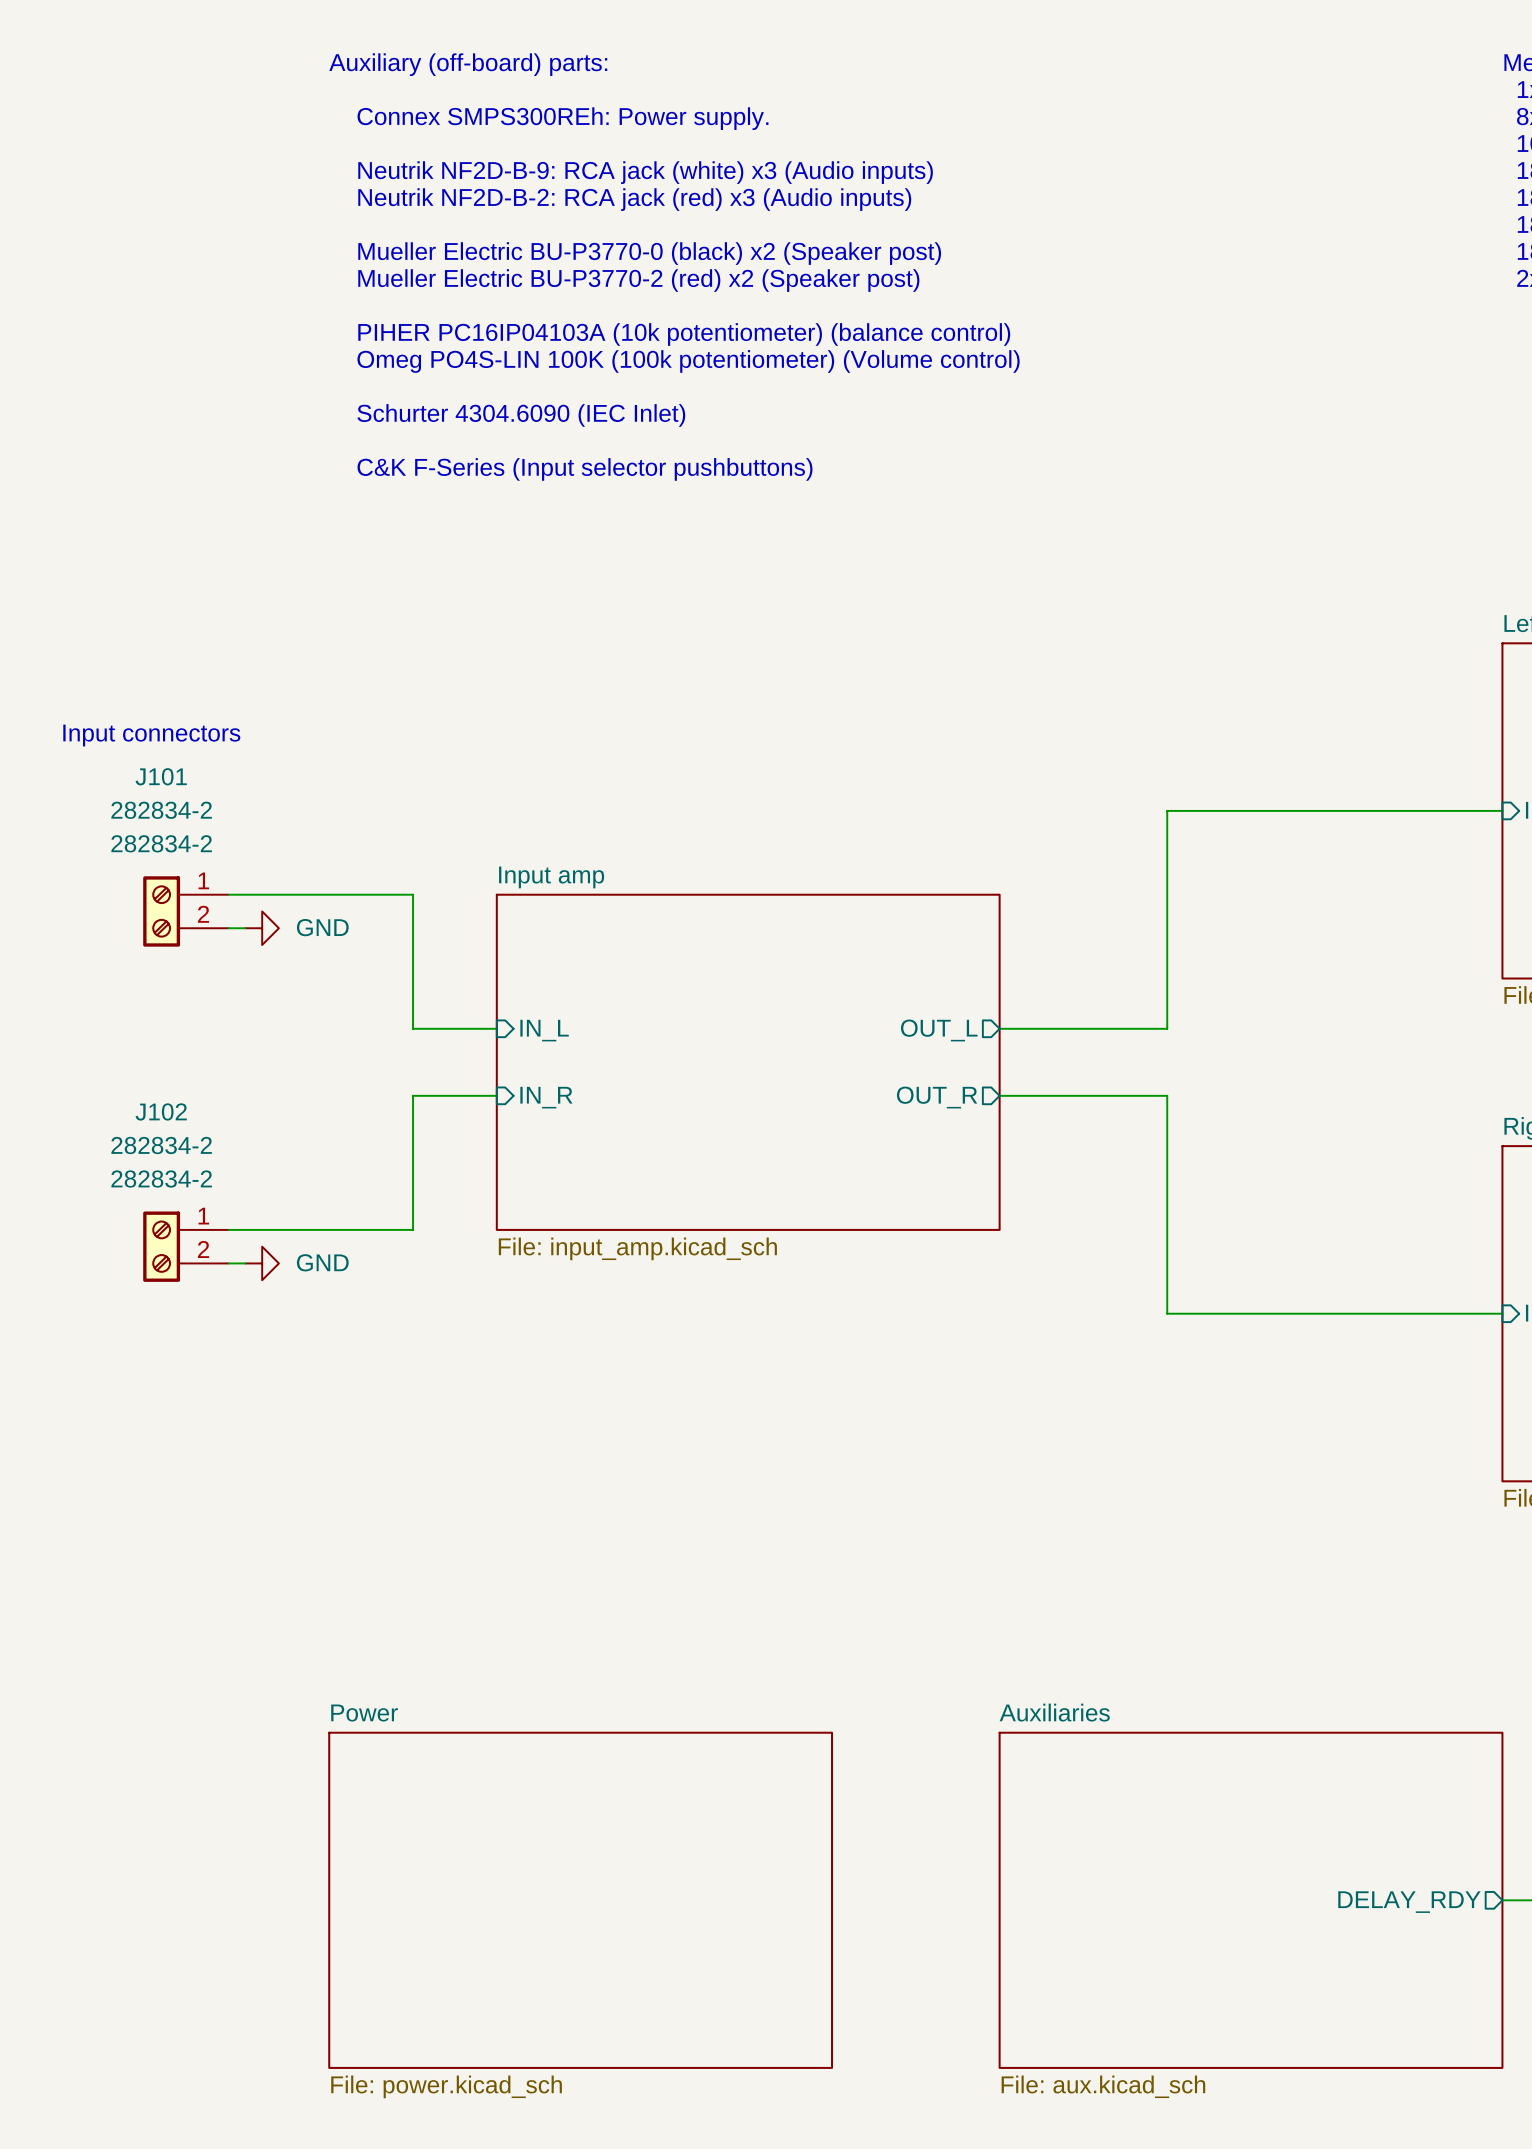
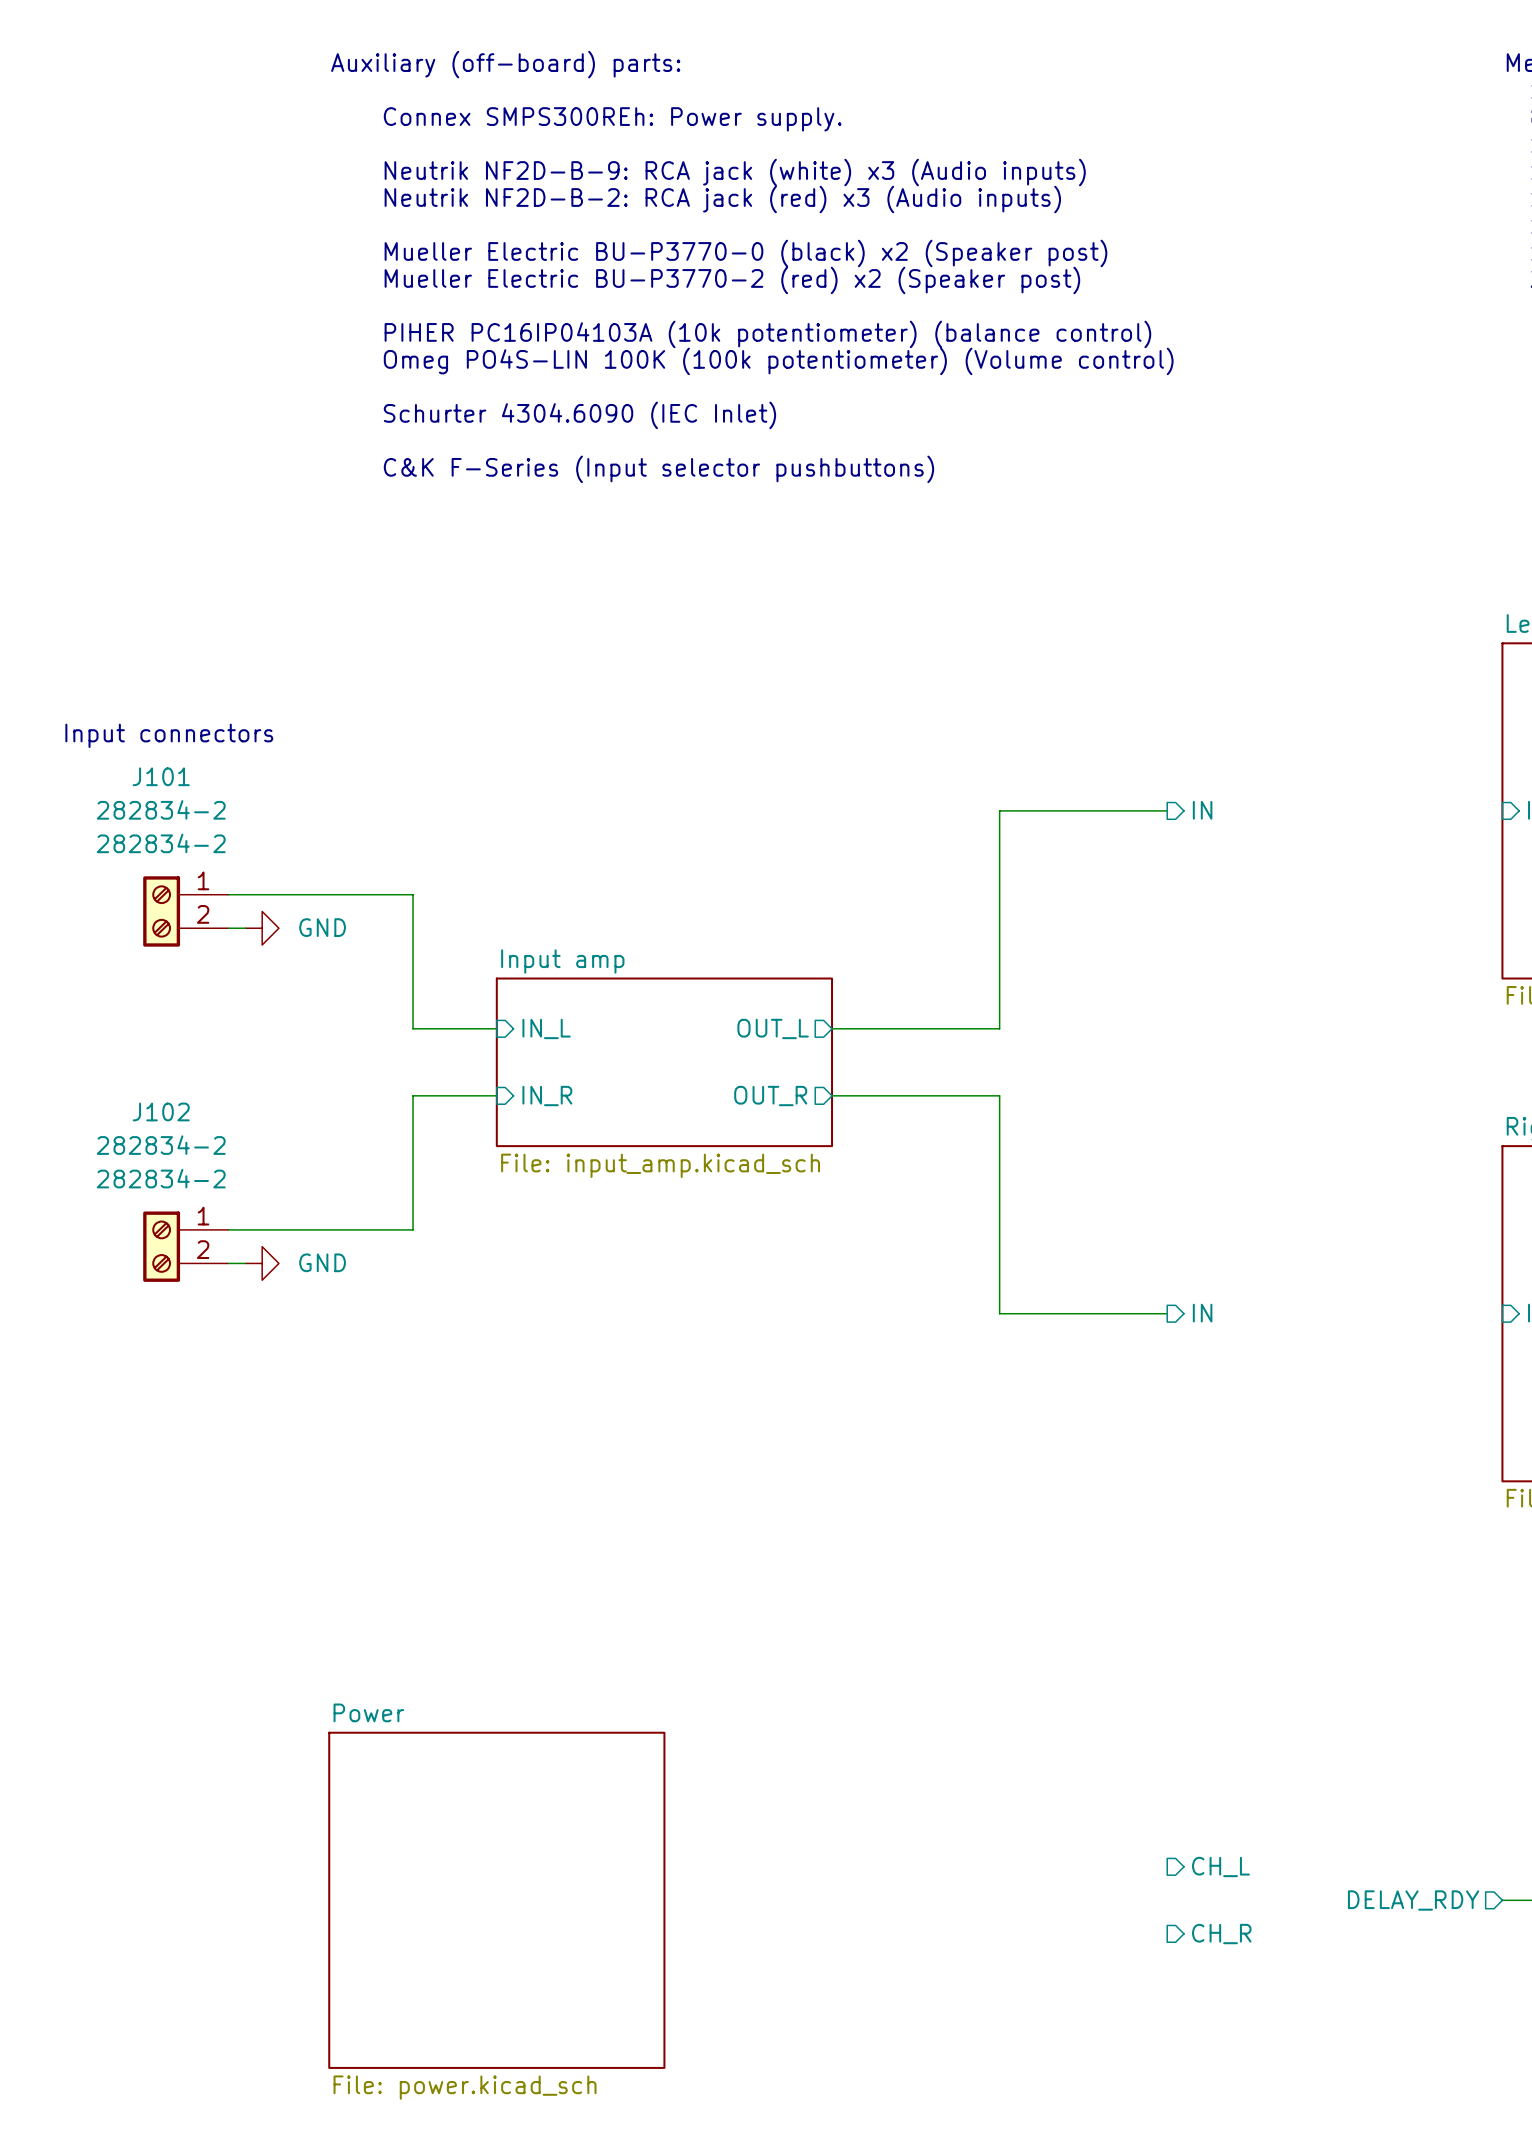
wire: none -> (1167, 810) (999, 810) (999, 1028) (832, 1028)
sheet pin: none -> IN (1202, 810)
wire: (1502, 810) (1167, 810) (1167, 1028) (999, 1028) -> none
sheet pin position: OUT_L (939, 1030) -> OUT_L (773, 1028)
sheet Input amp: none -> File: input_amp.kicad_sch (664, 1062)
sheet Input amp: File: input_amp.kicad_sch (748, 1062) -> none
wire: none -> (832, 1095) (999, 1095) (999, 1313) (1167, 1313)
wire: (999, 1095) (1167, 1095) (1167, 1313) (1502, 1313) -> none
sheet pin position: OUT_R (937, 1097) -> OUT_R (770, 1096)
sheet pin: none -> IN (1202, 1313)
sheet pin: none -> CH_L (1220, 1866)
sheet Power: none -> File: power.kicad_sch (496, 1900)
sheet Power: File: power.kicad_sch (580, 1900) -> none
sheet Auxiliaries: File: aux.kicad_sch (1251, 1900) -> none
sheet pin: none -> CH_R (1221, 1934)

